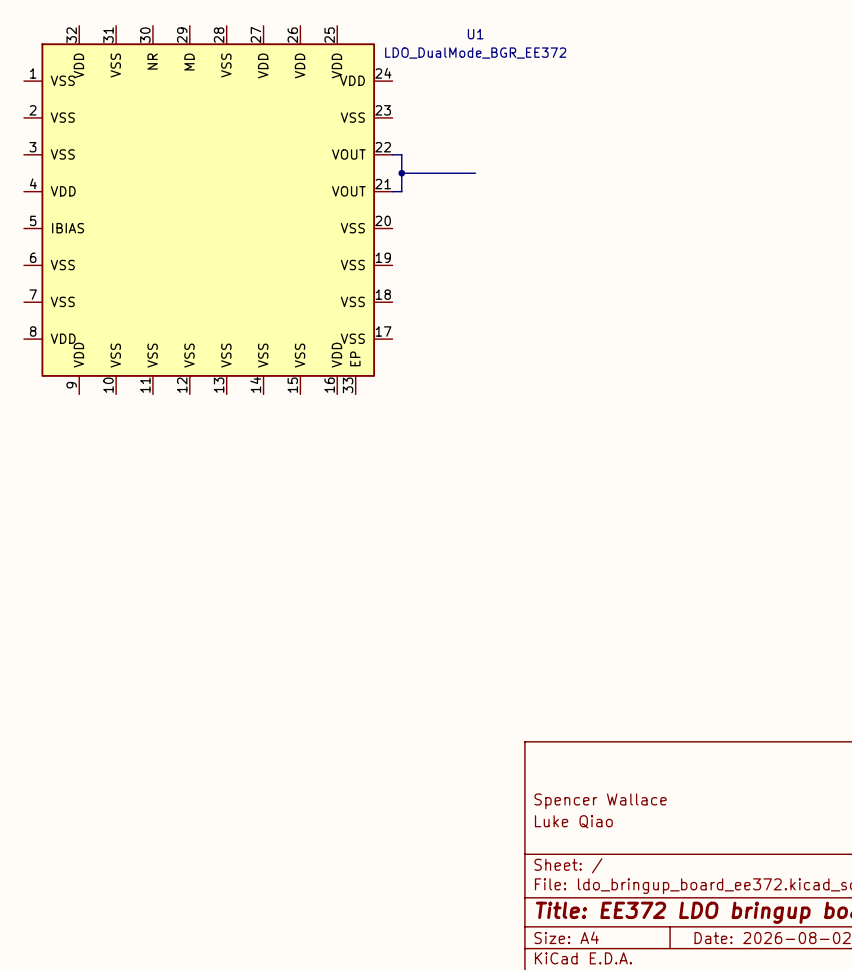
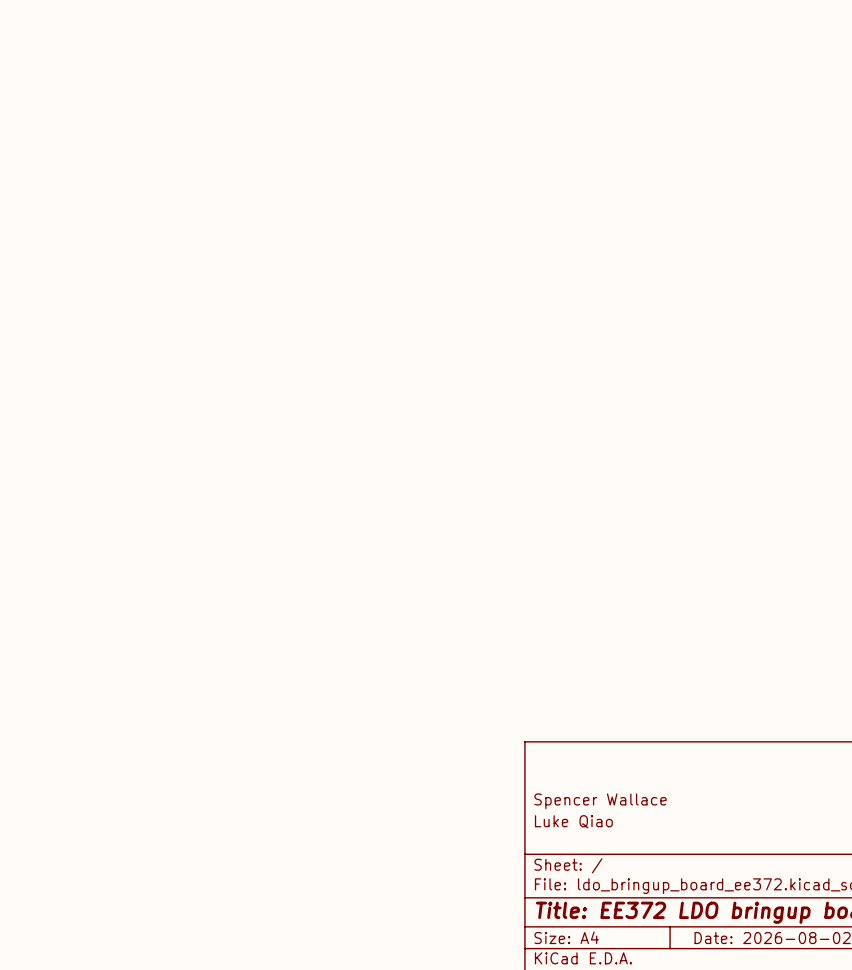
wire: (392, 154) (401, 154) (401, 191) (392, 191) -> none
wire: (401, 173) (475, 173) -> none
junction: (401, 173) -> none
U1: LDO_DualMode_BGR_EE372 (208, 210) -> none

